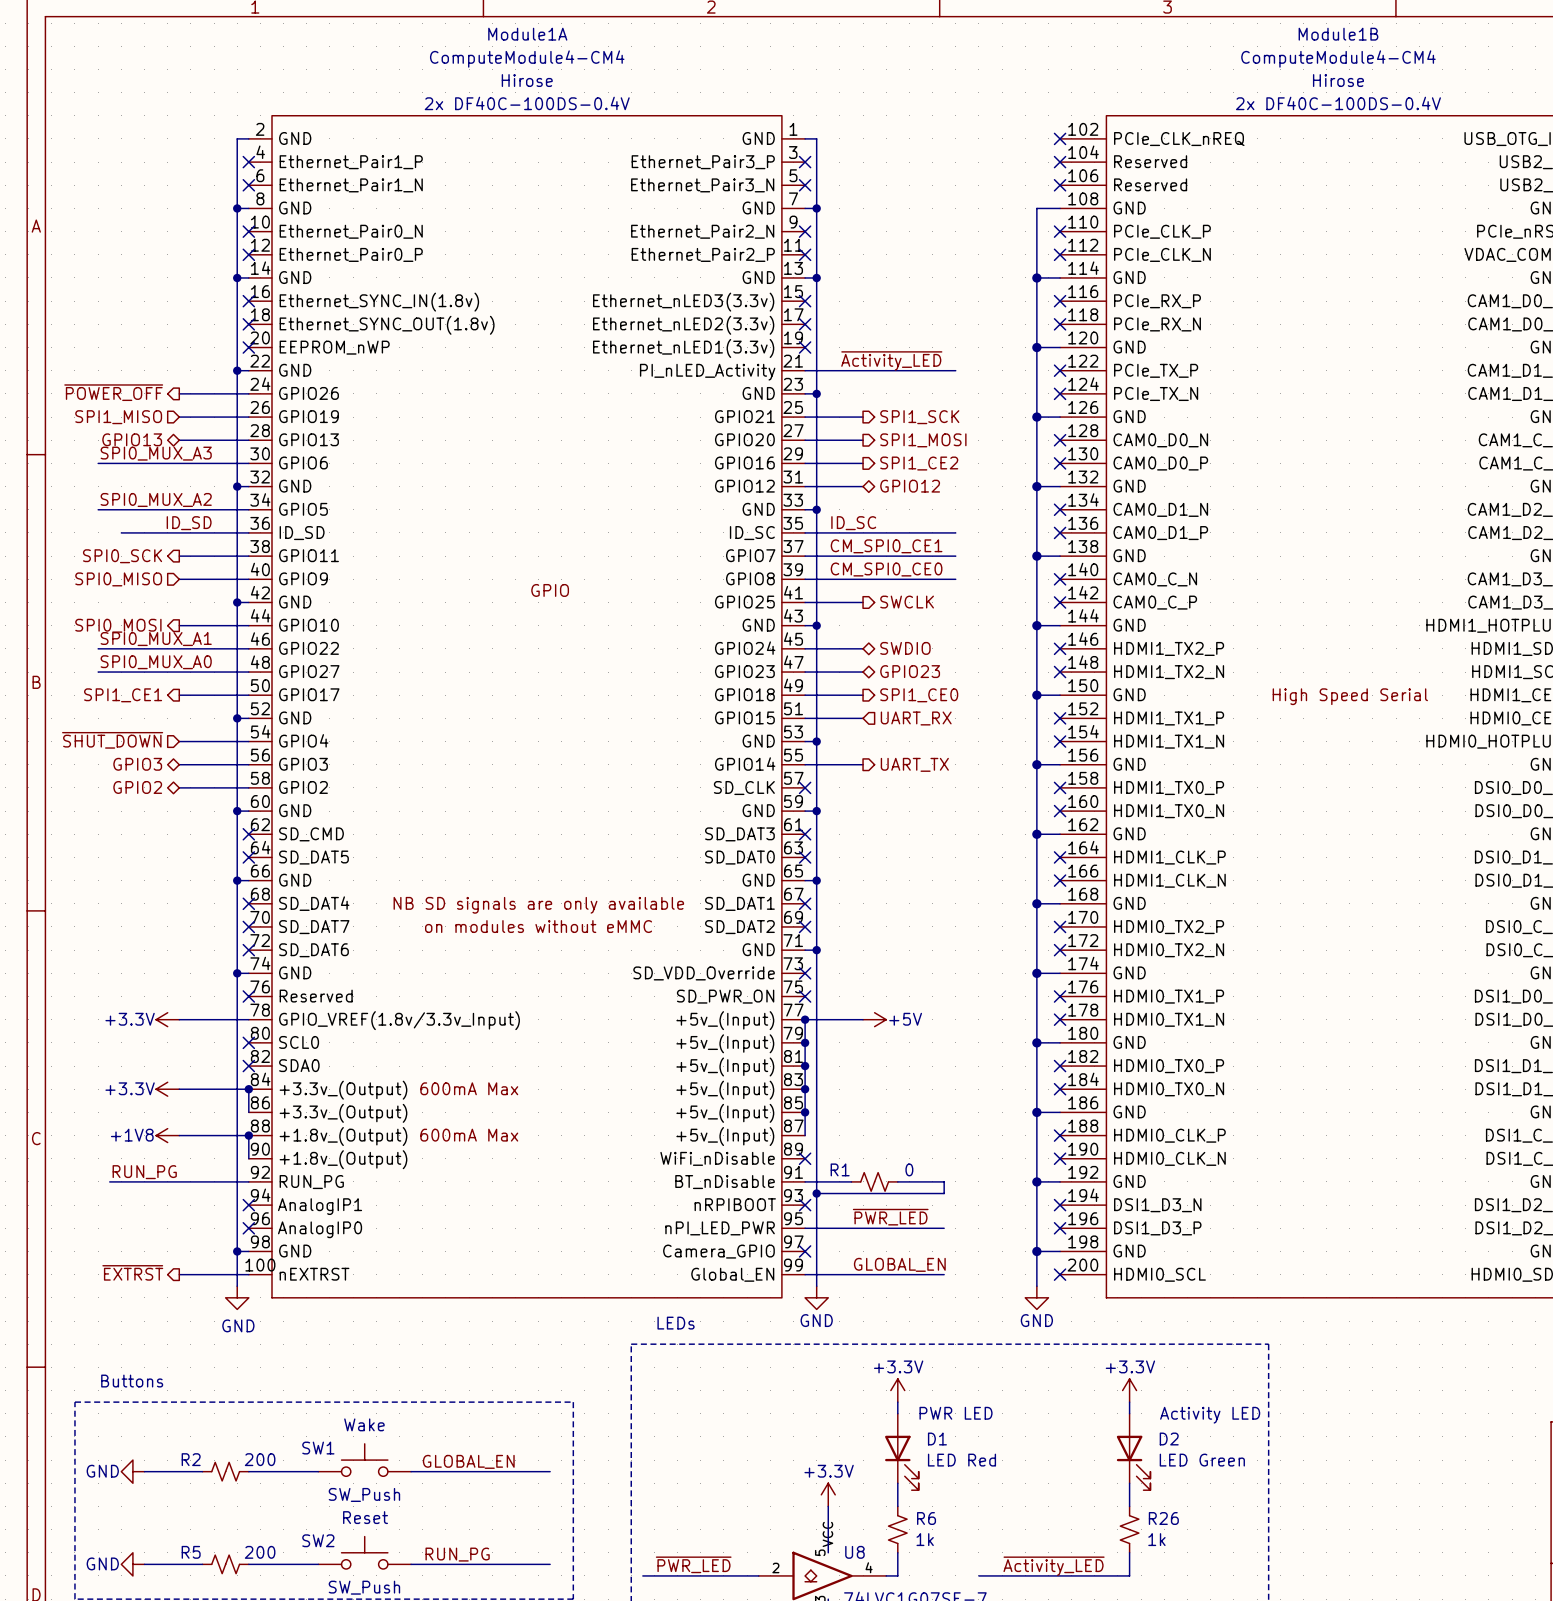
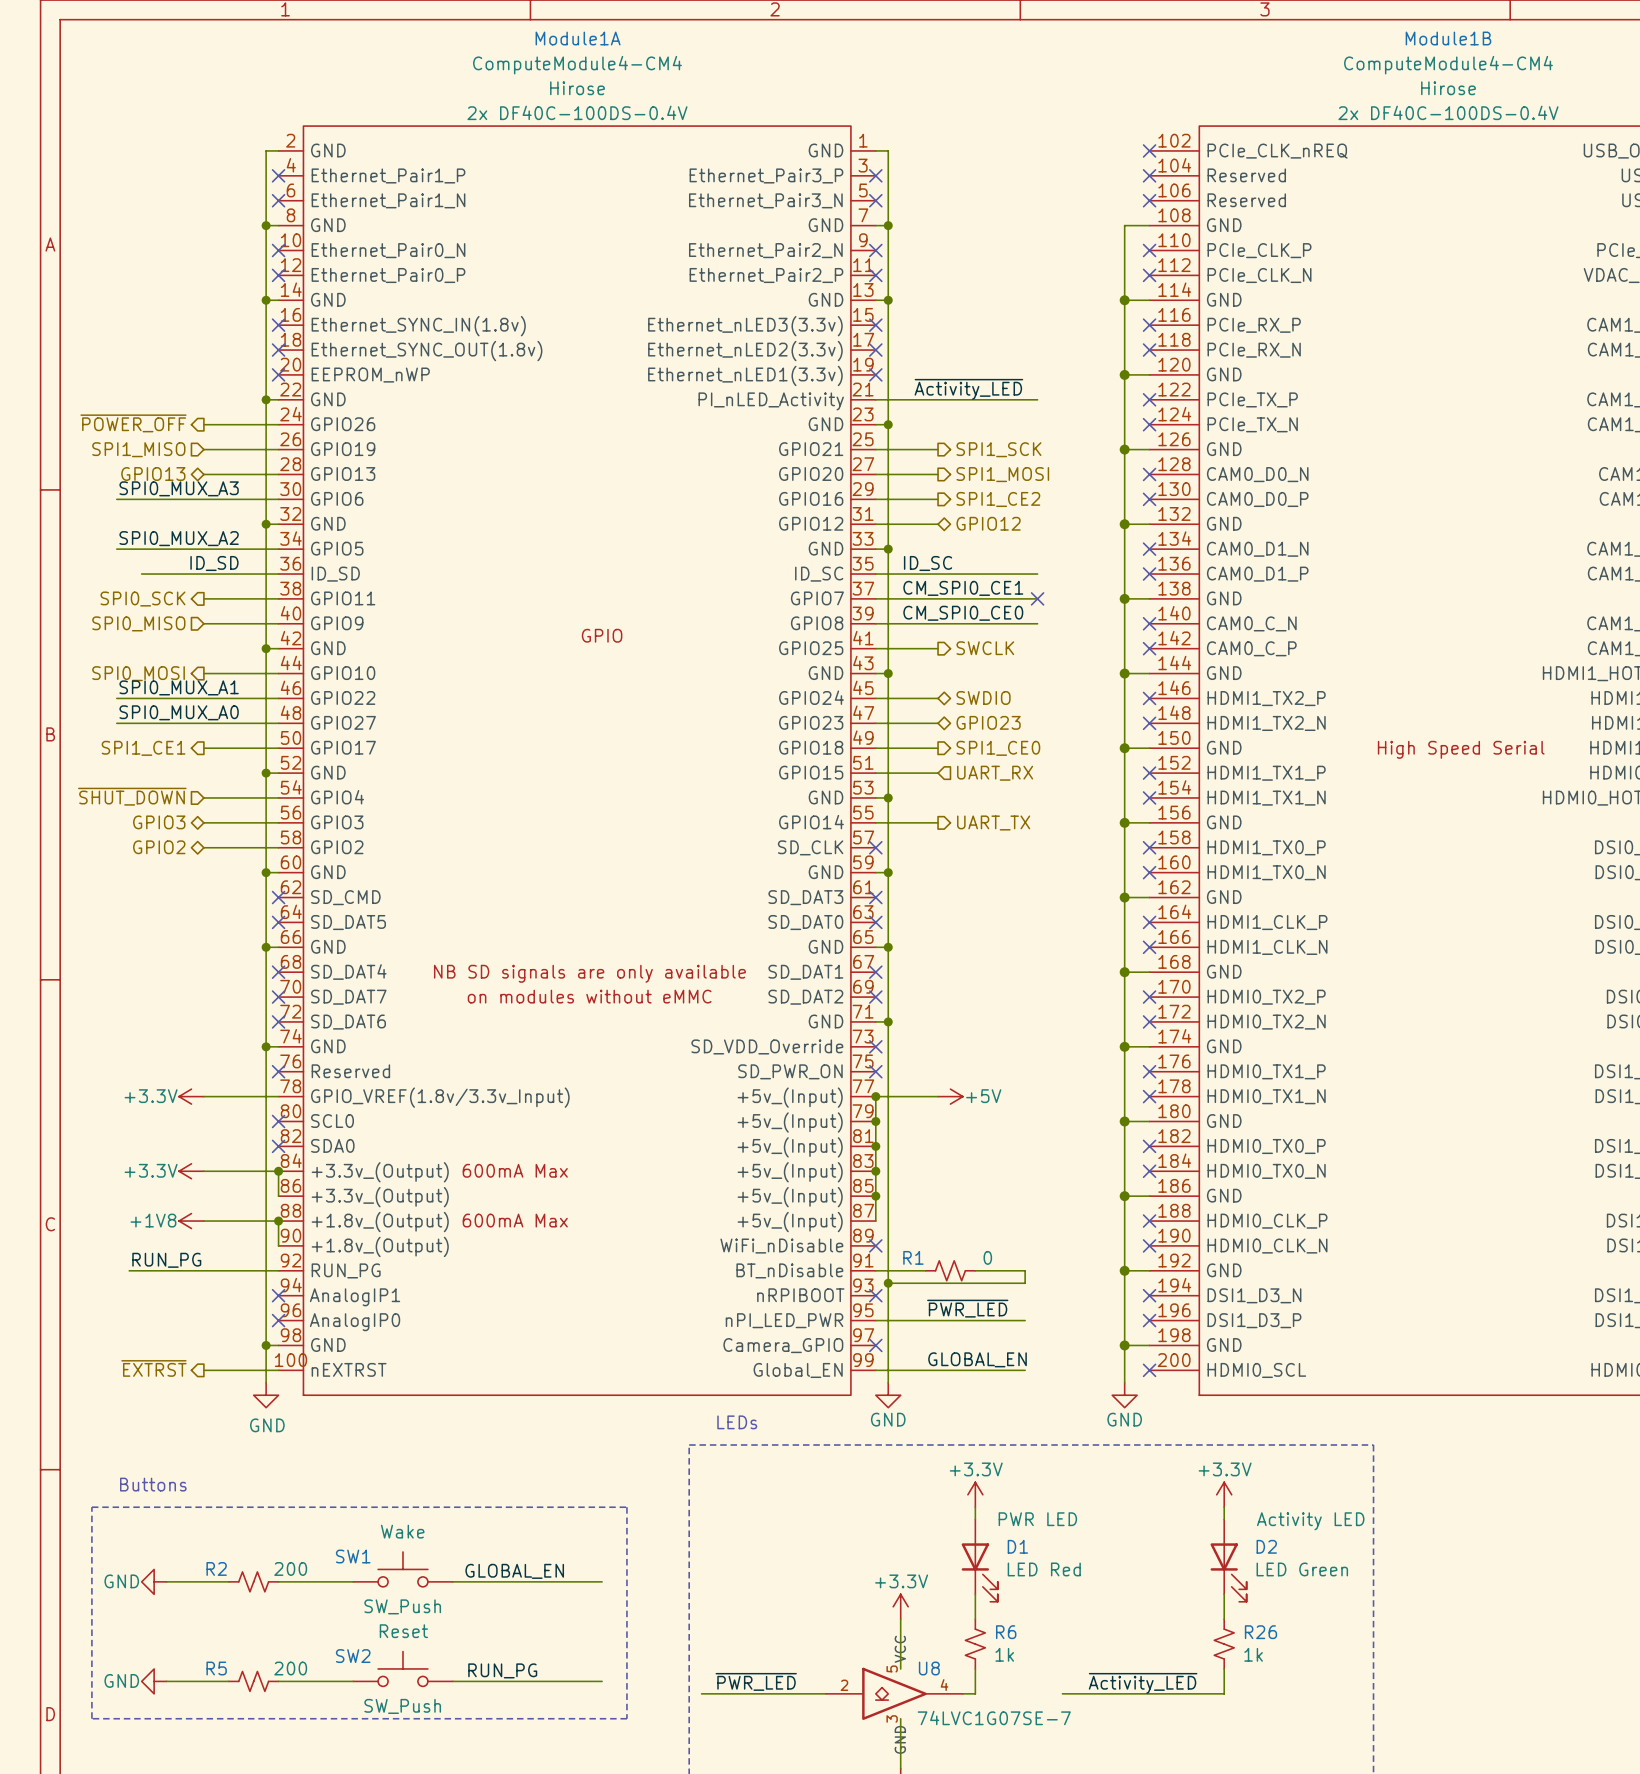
no-connect mark: none -> (1037, 598)

